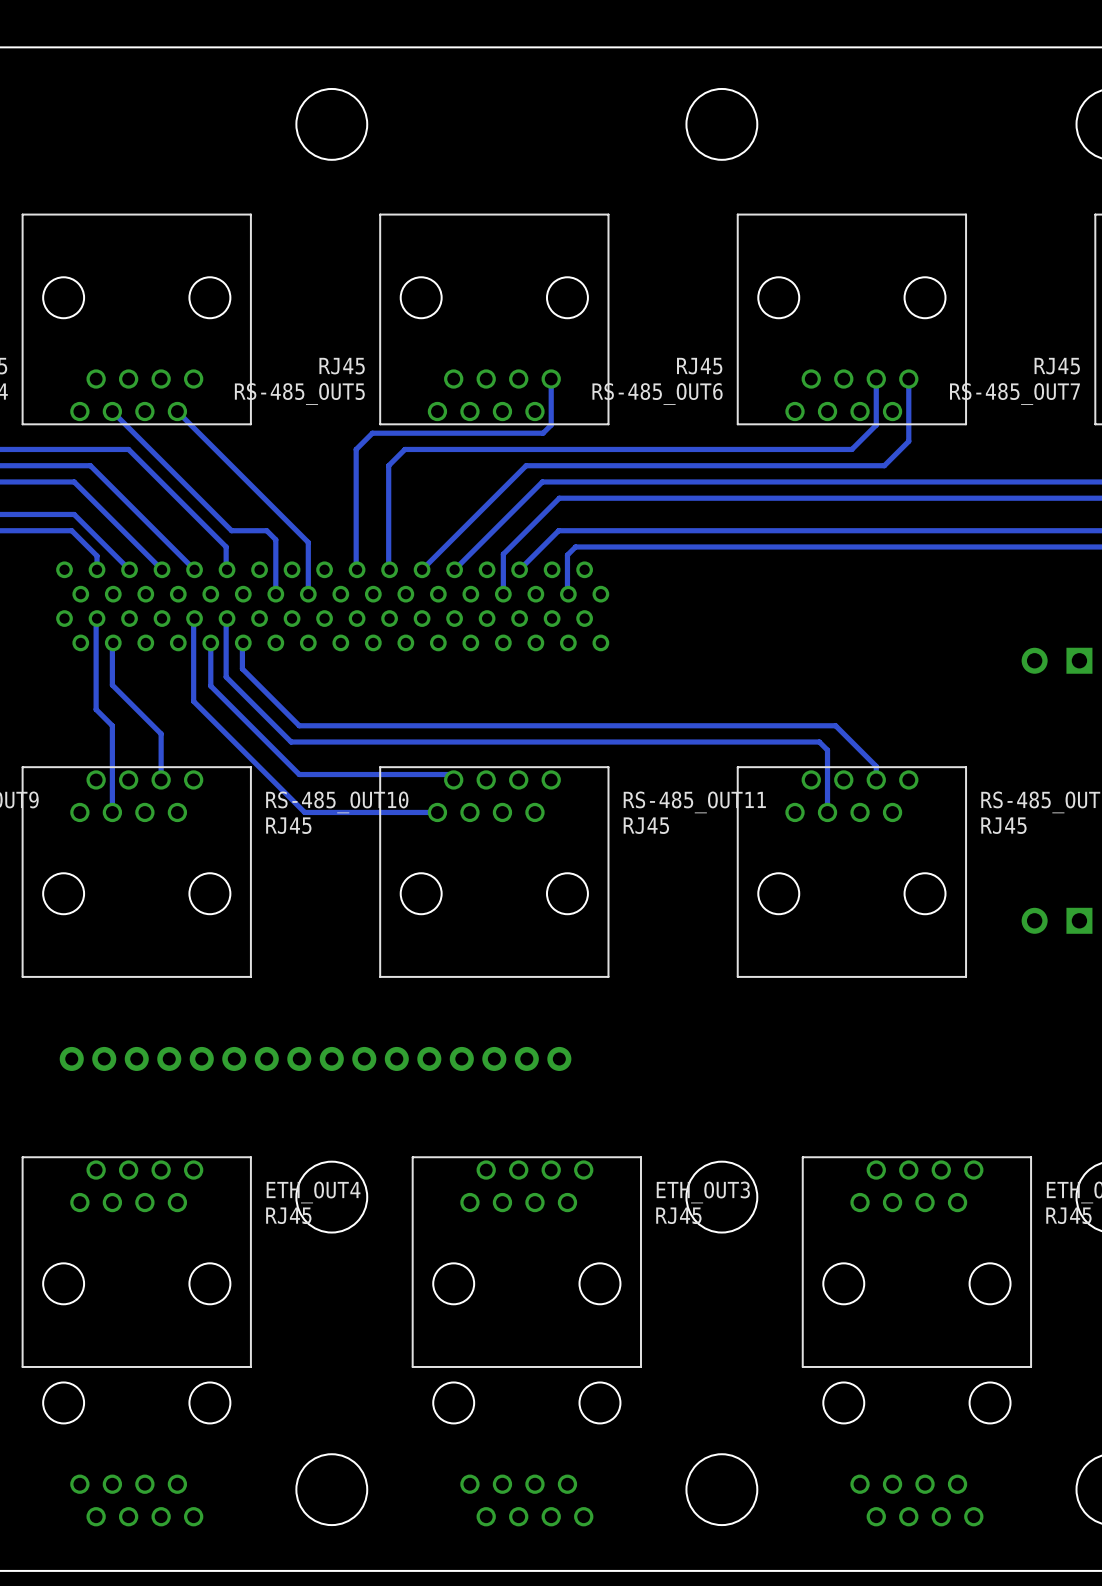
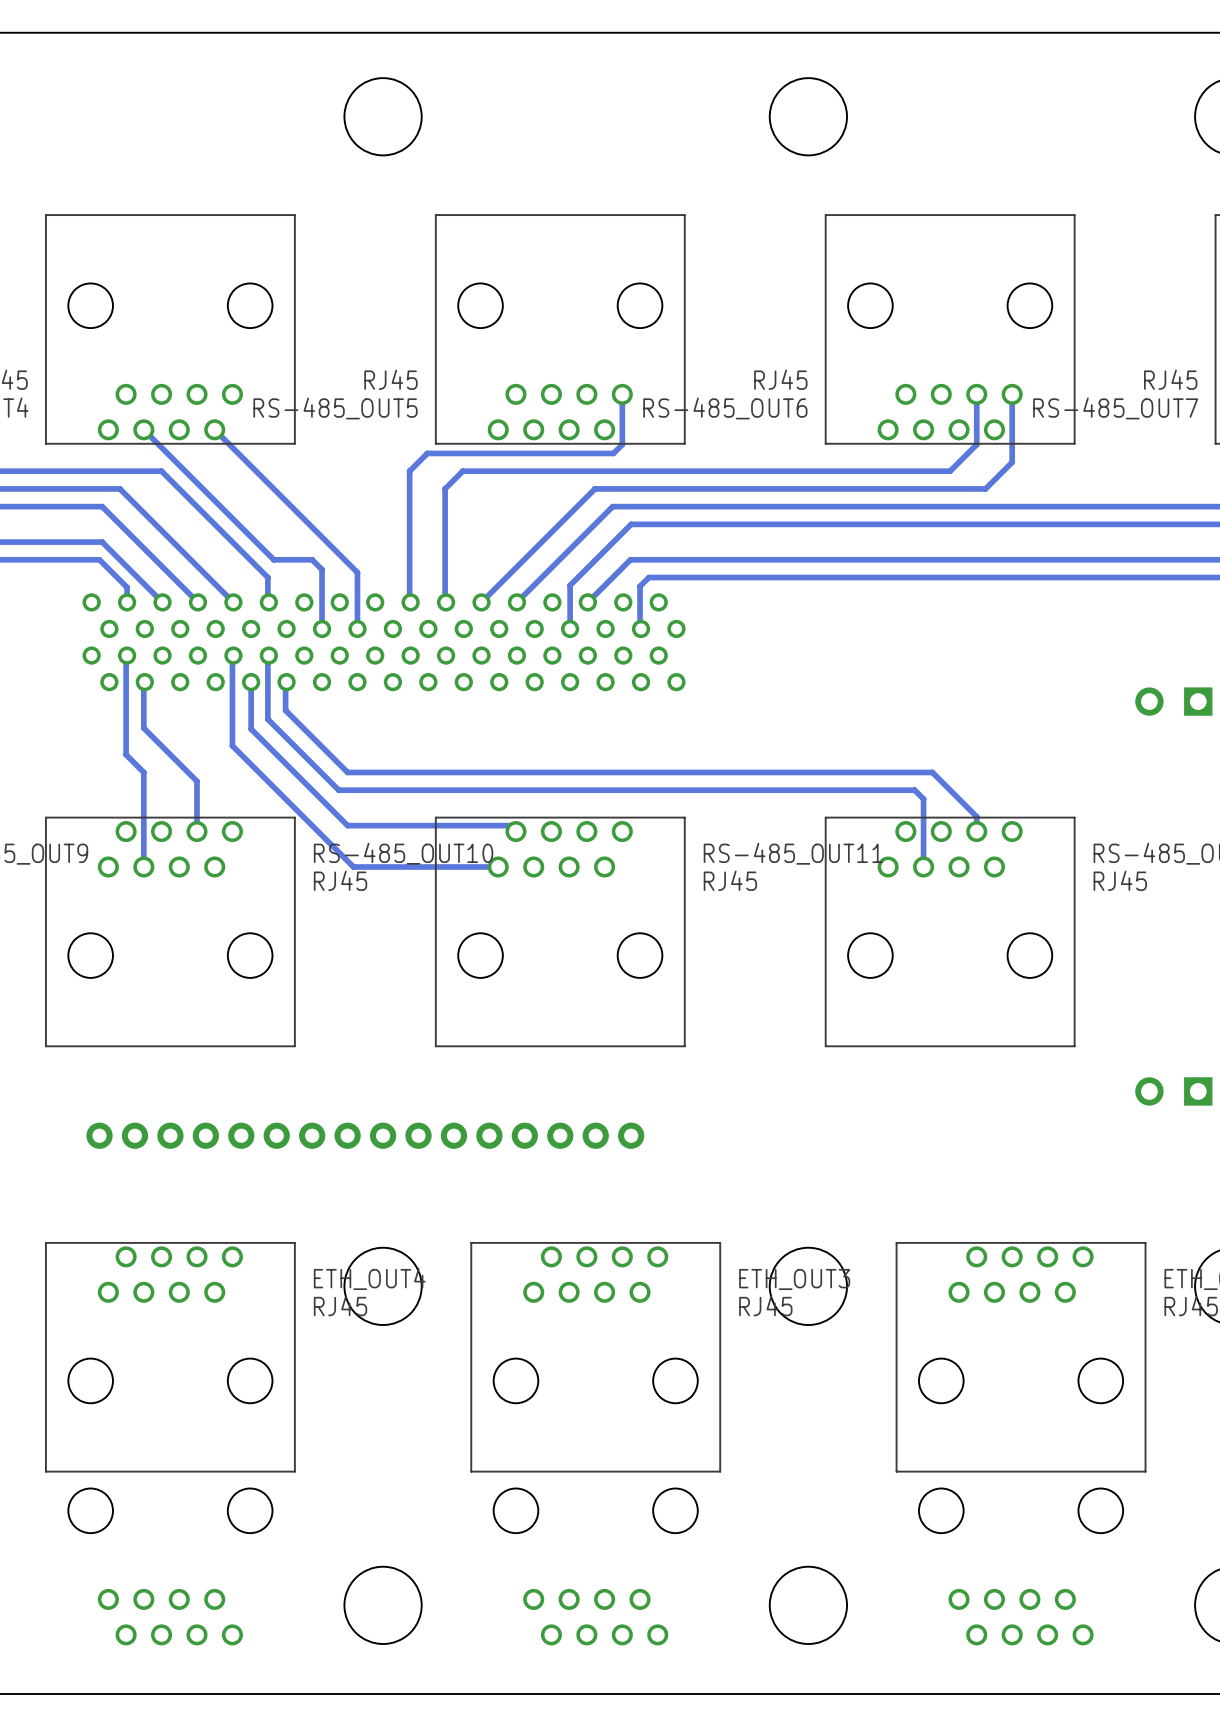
part position: (1057, 920) -> (1173, 1091)

